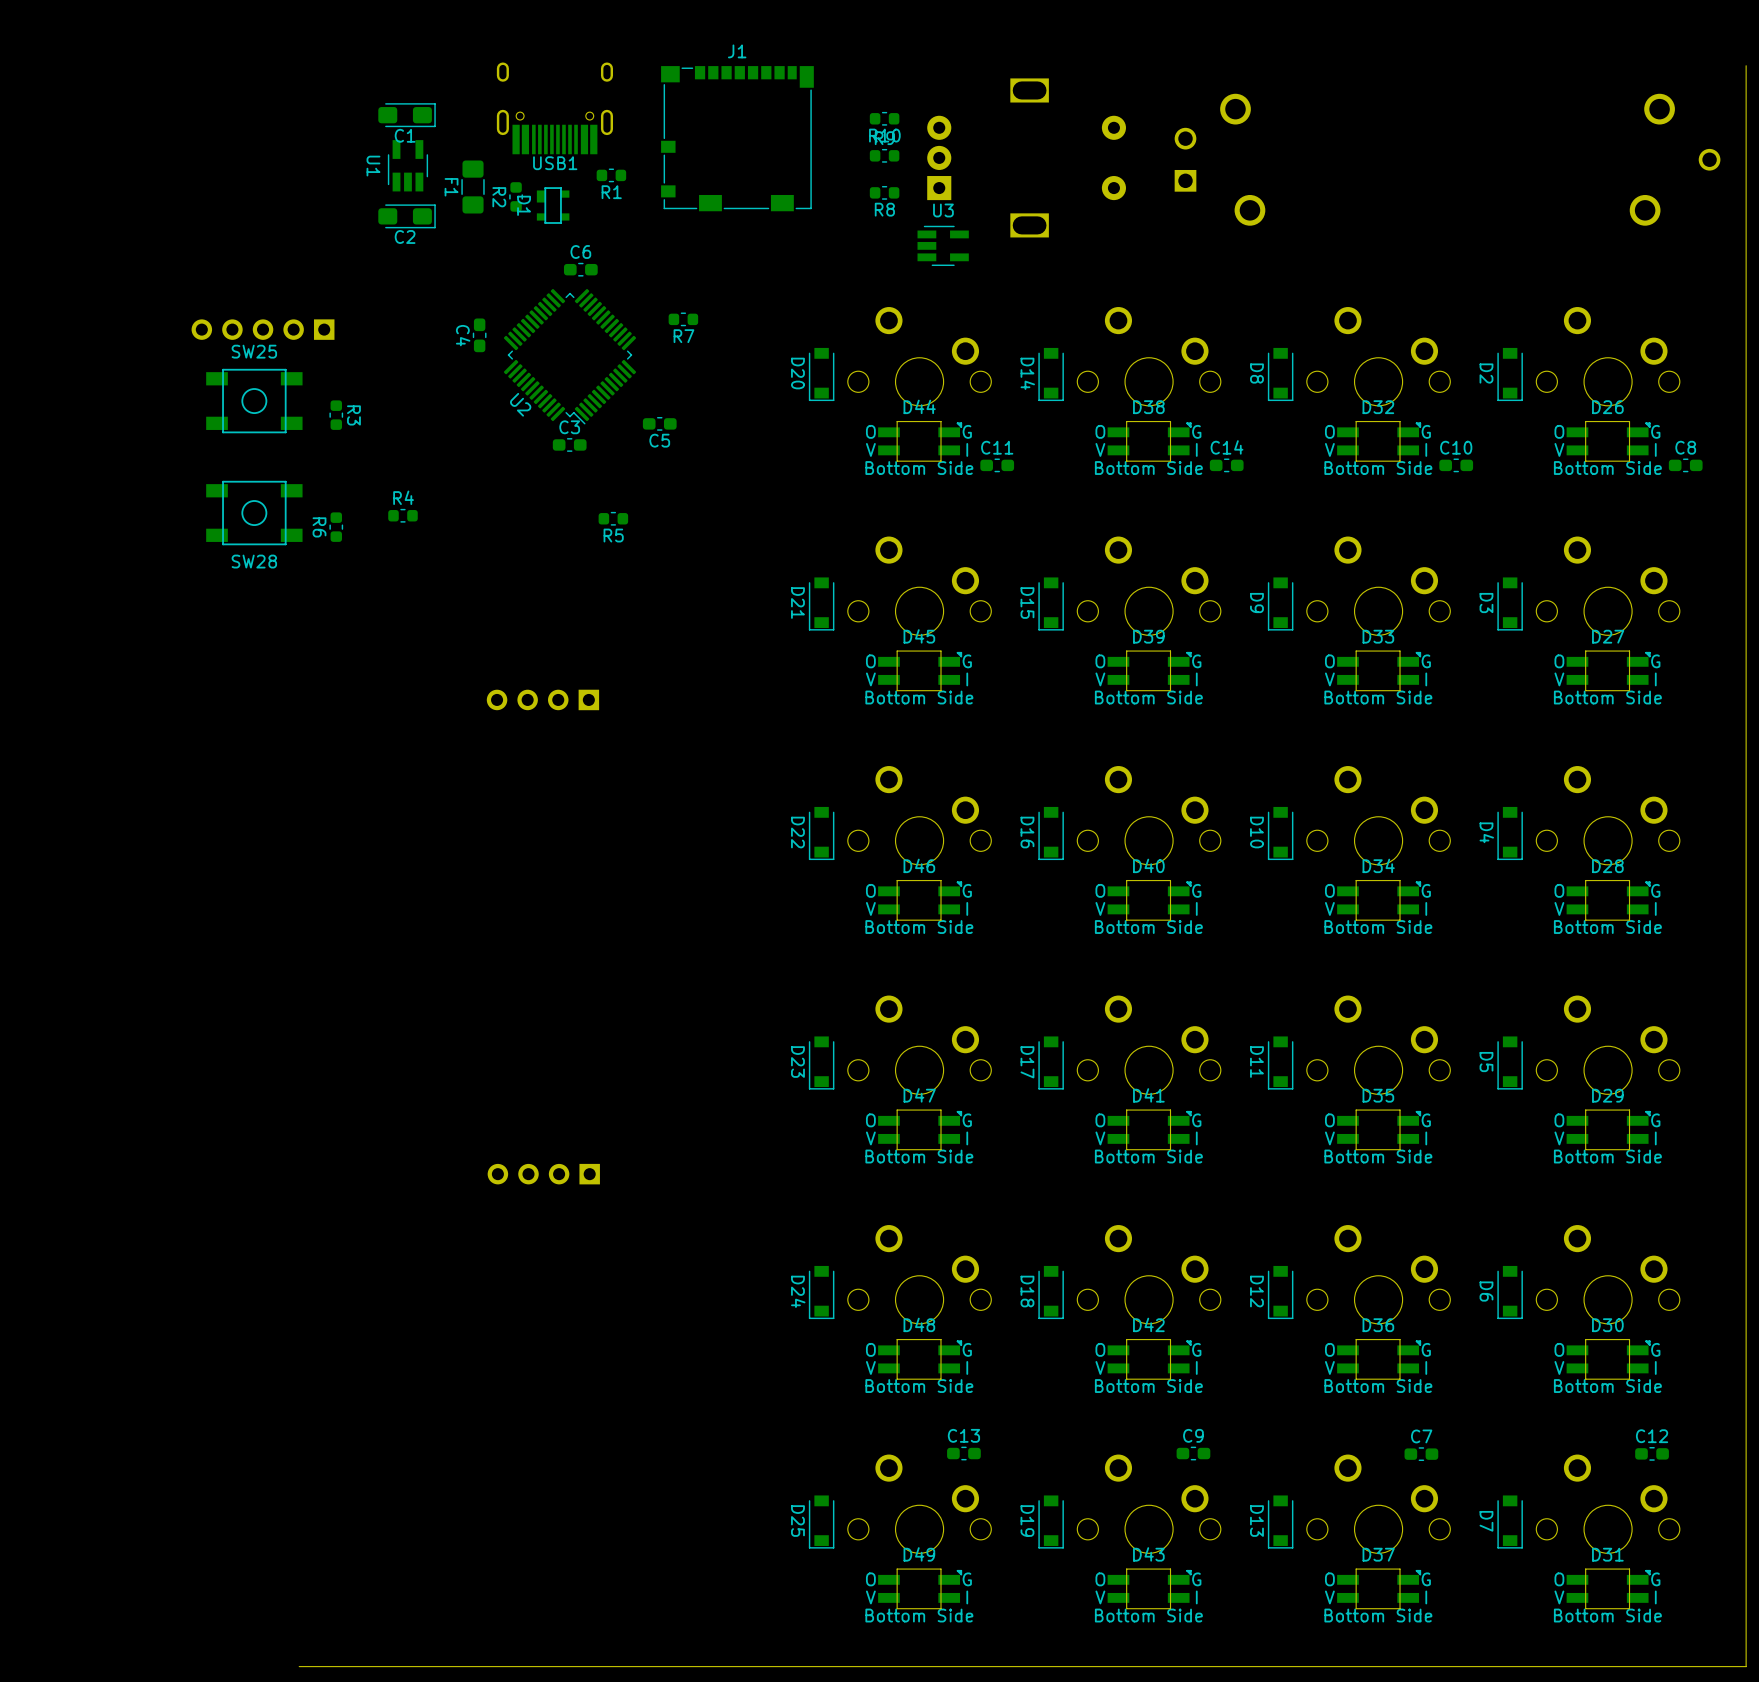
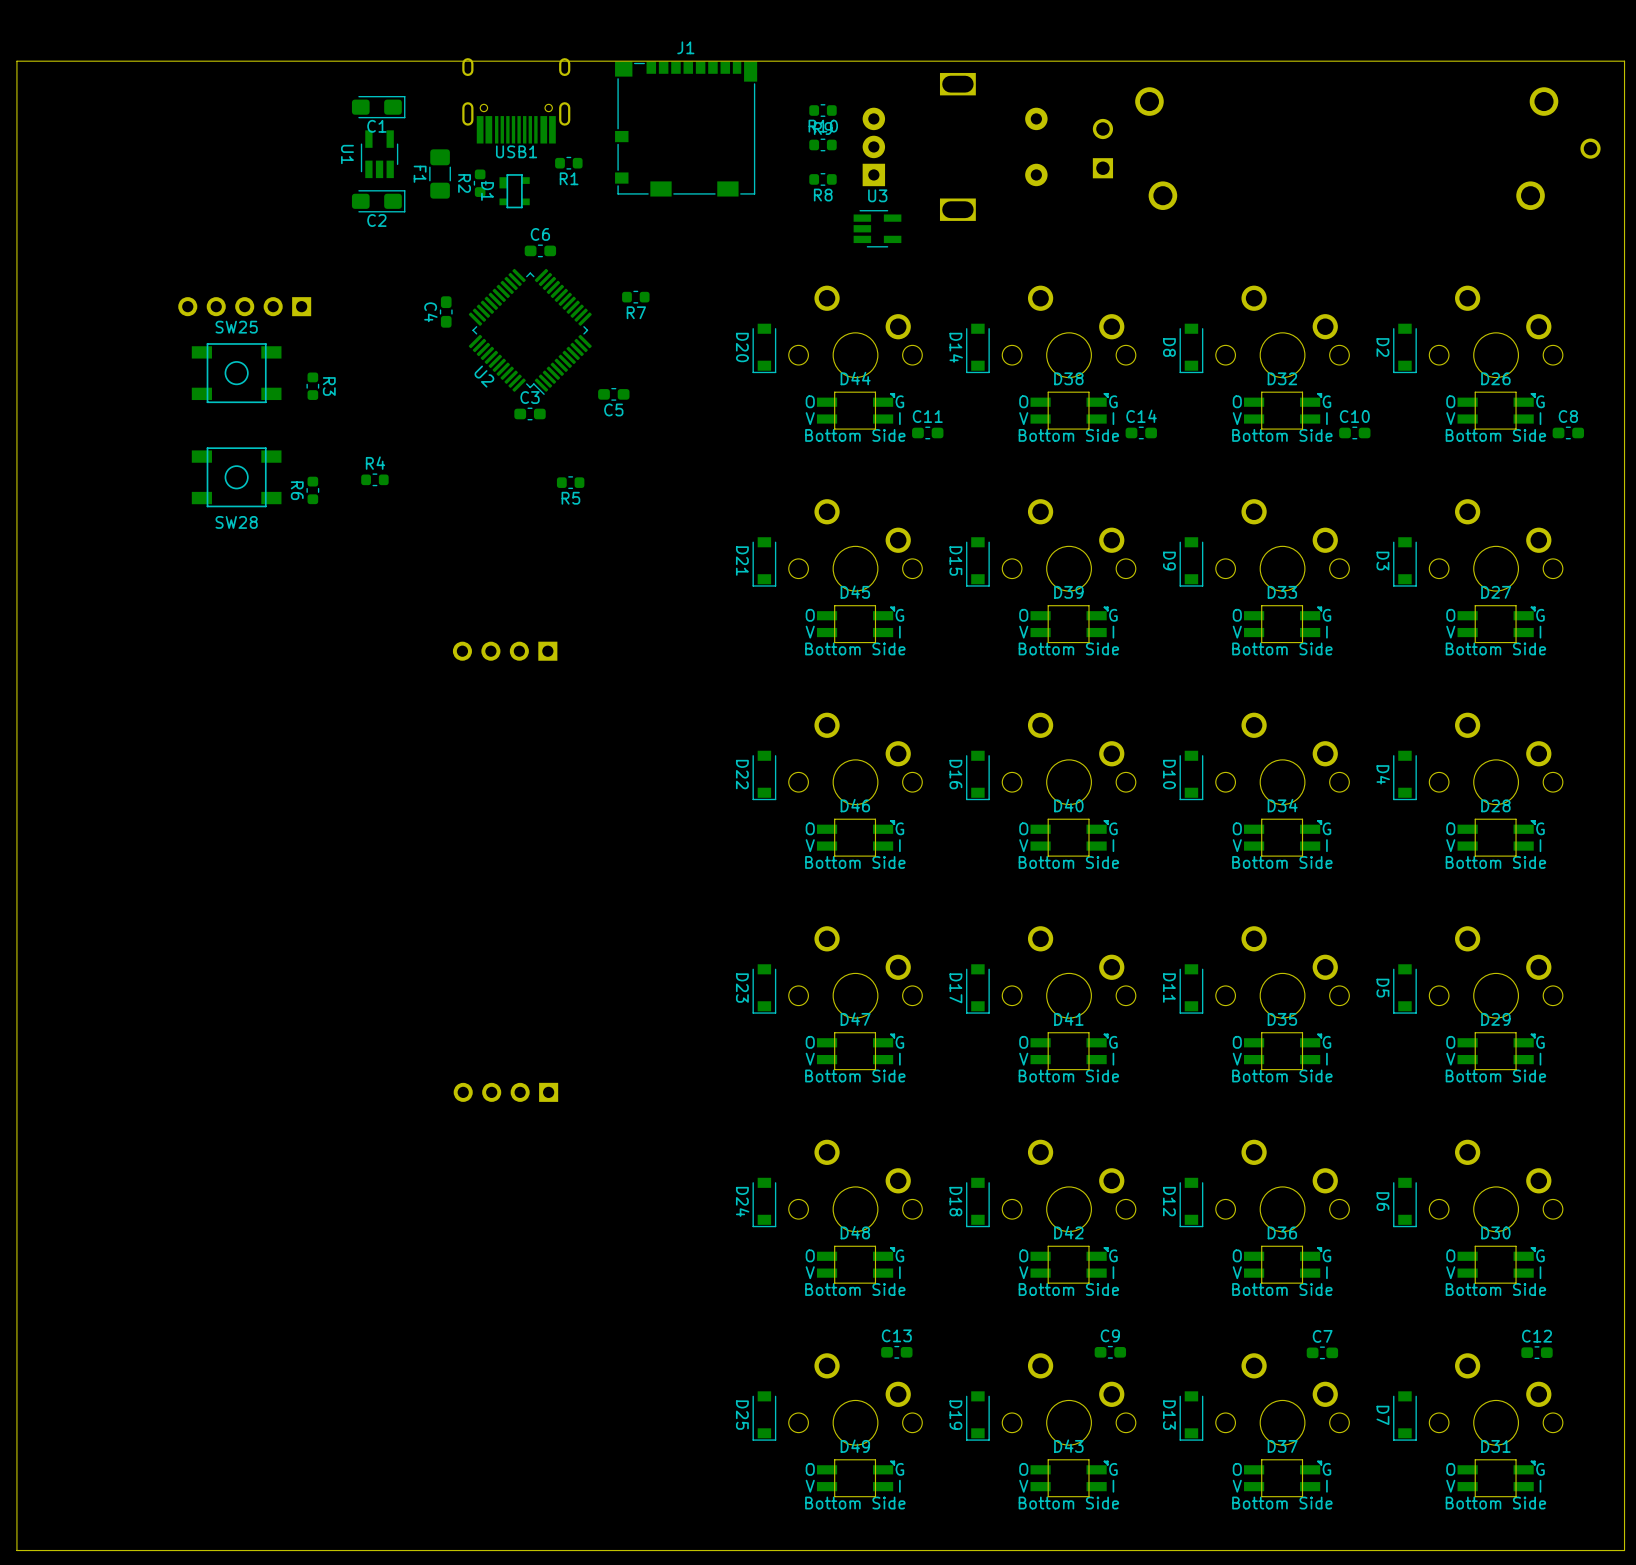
board edge: none -> (1624, 61) (16, 61) (16, 1550) (278, 1550)

